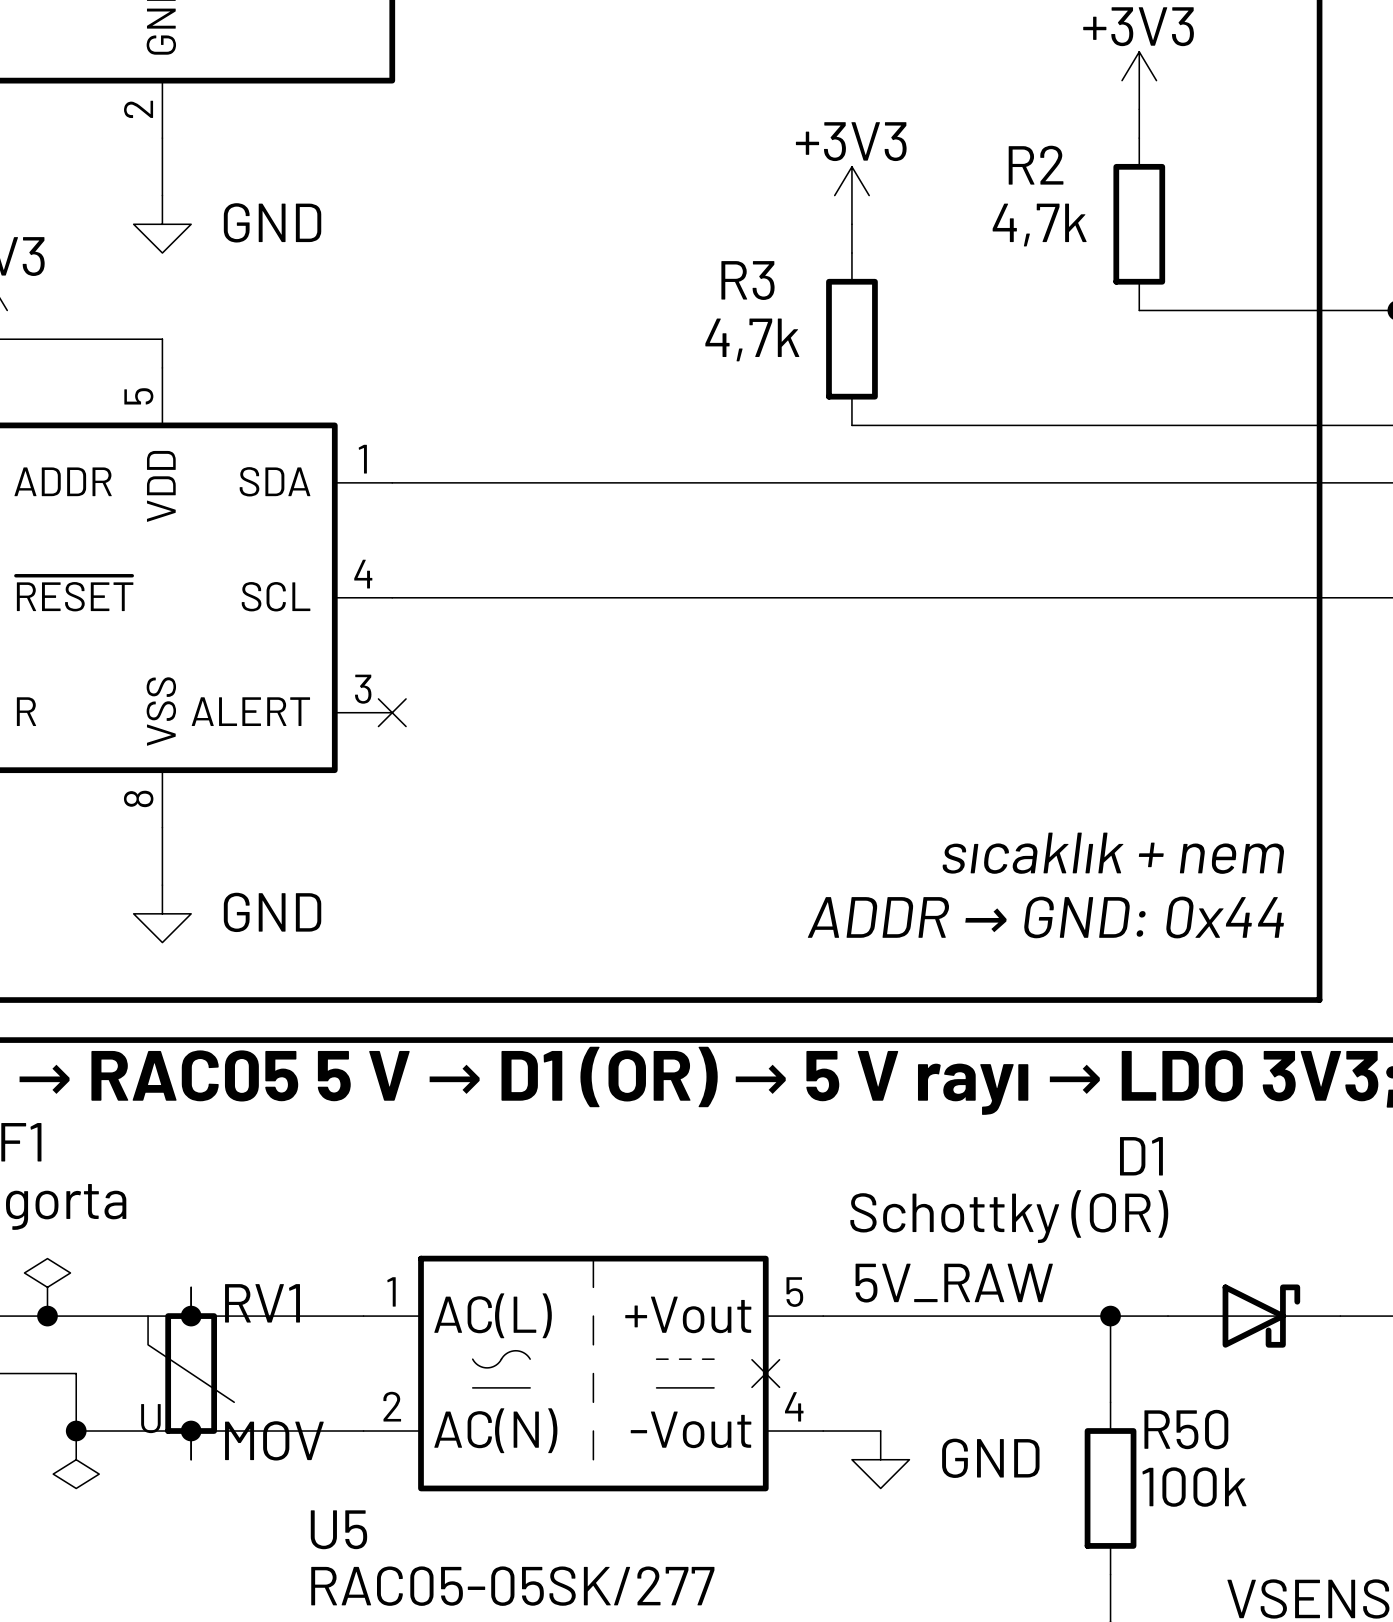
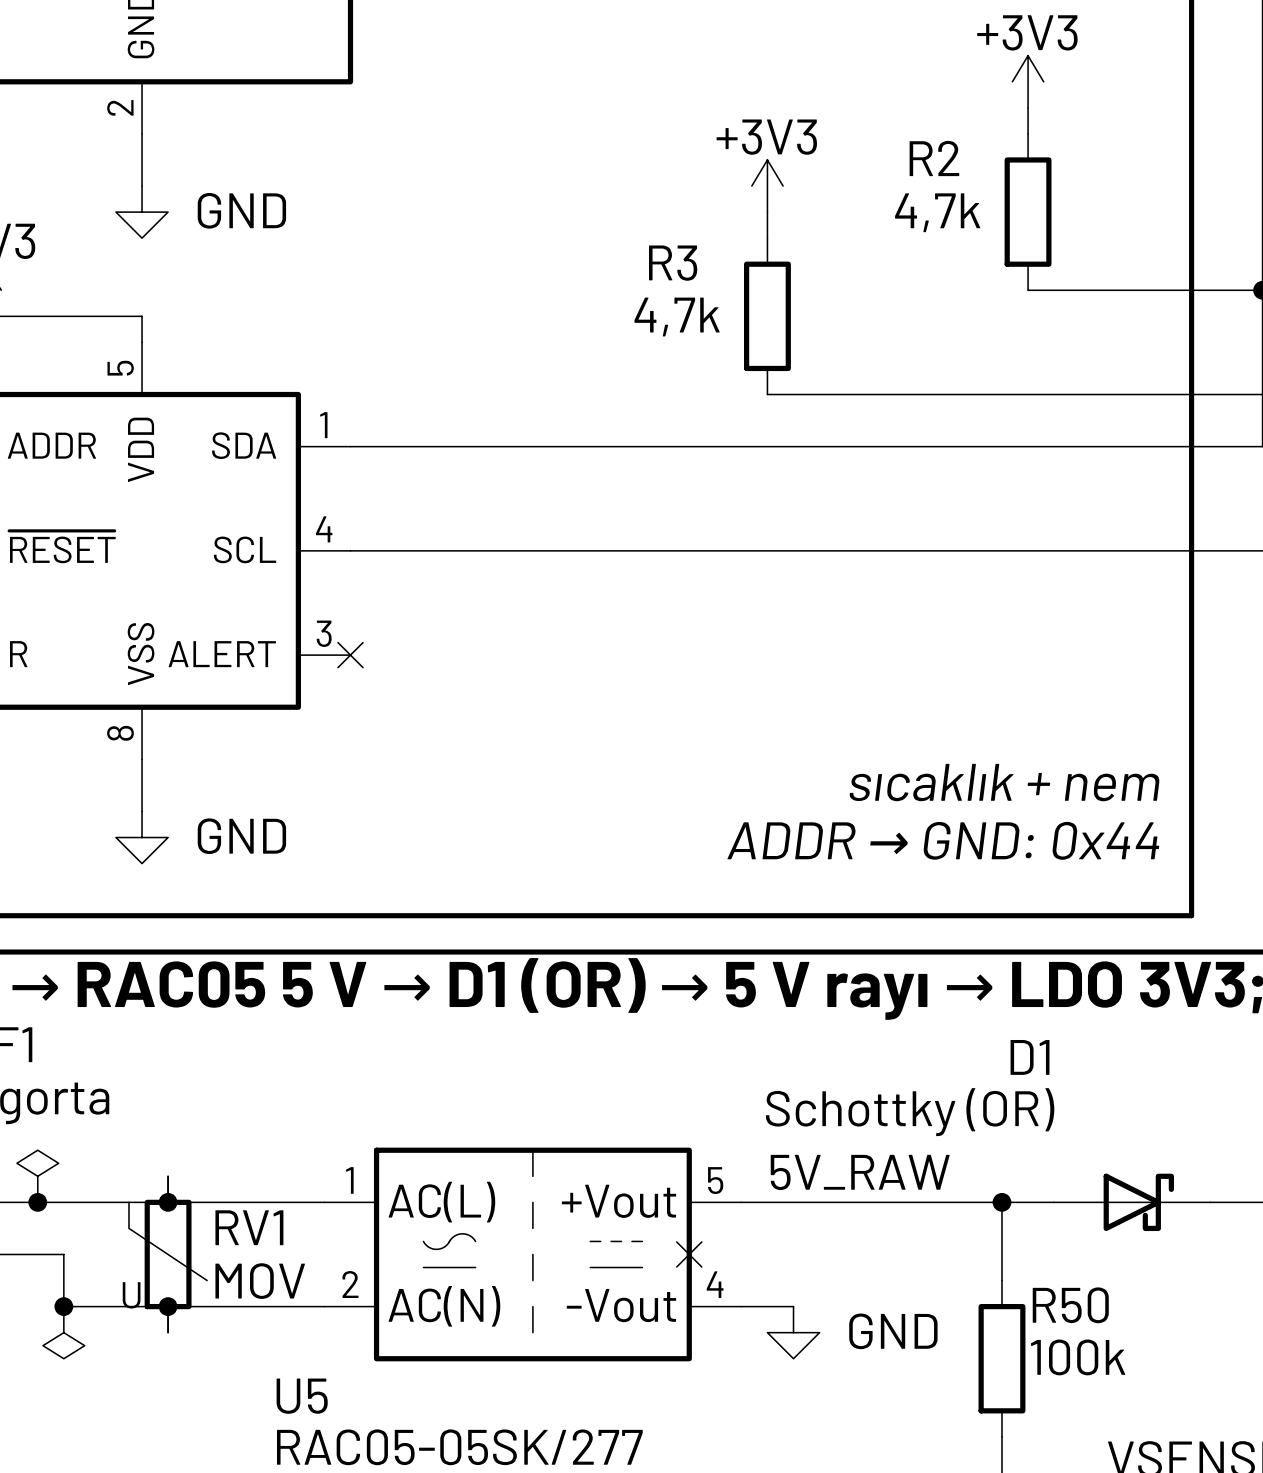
RV1 name position: RV1 (262, 1303) -> RV1 (249, 1227)
RV1 value position: MOV (274, 1440) -> MOV (260, 1281)

